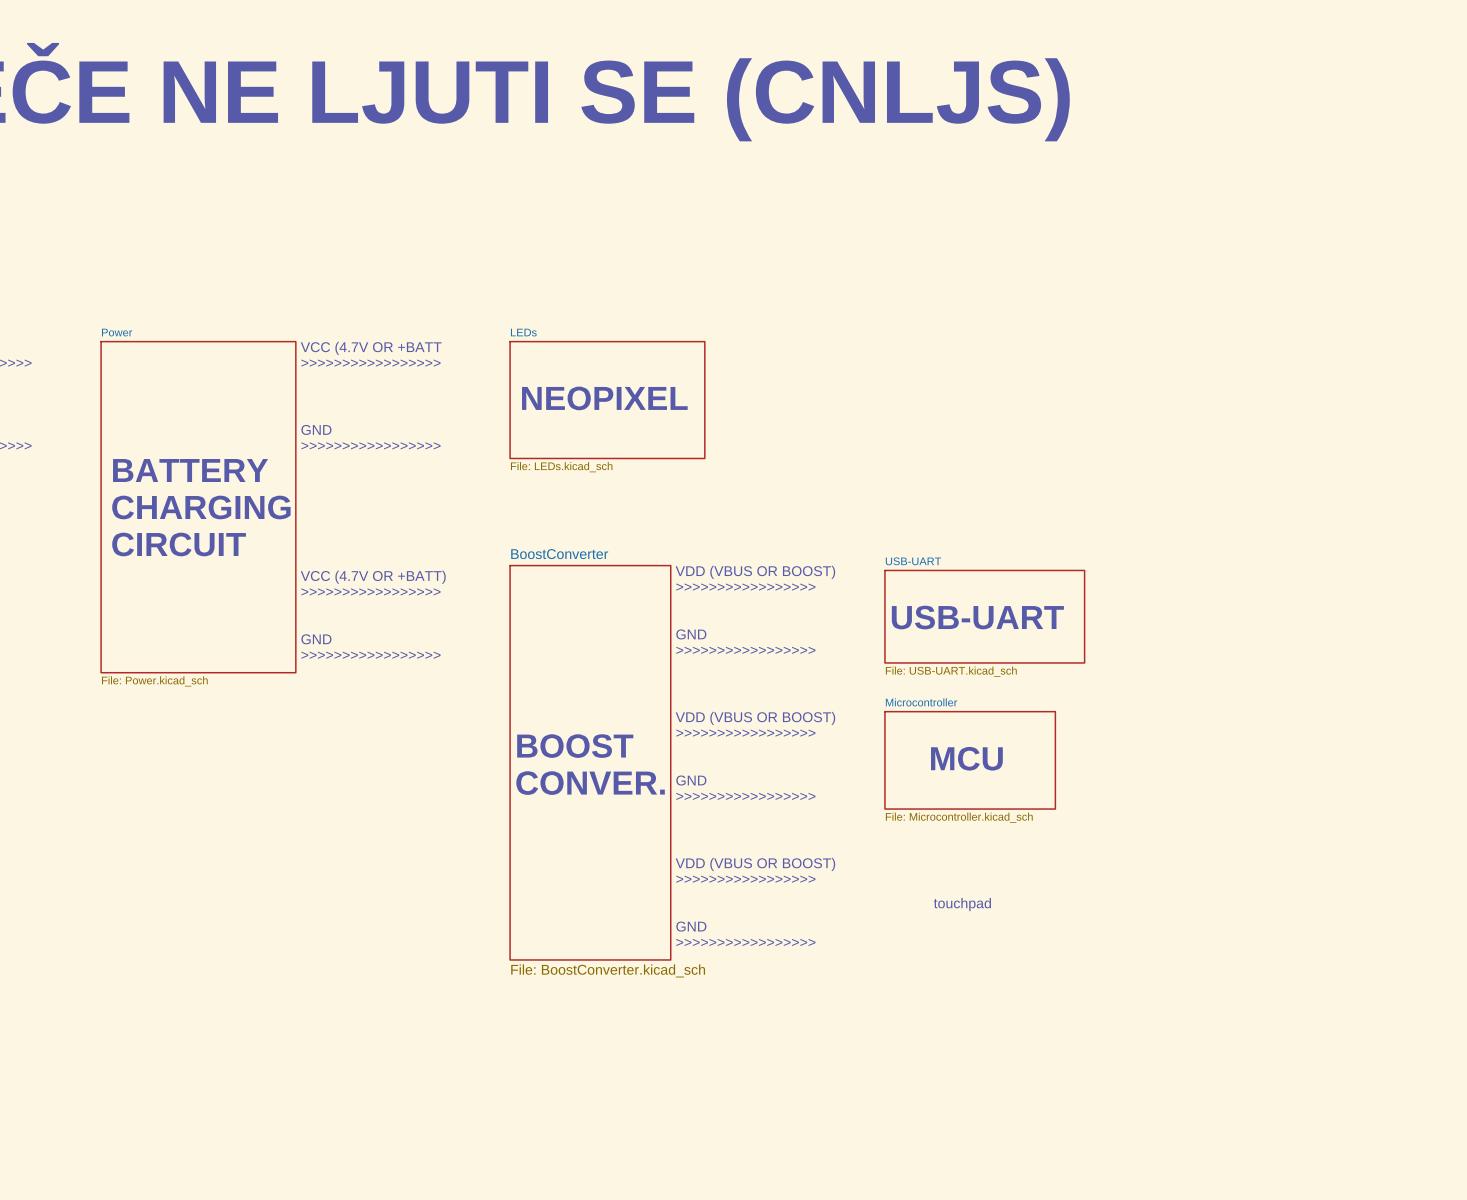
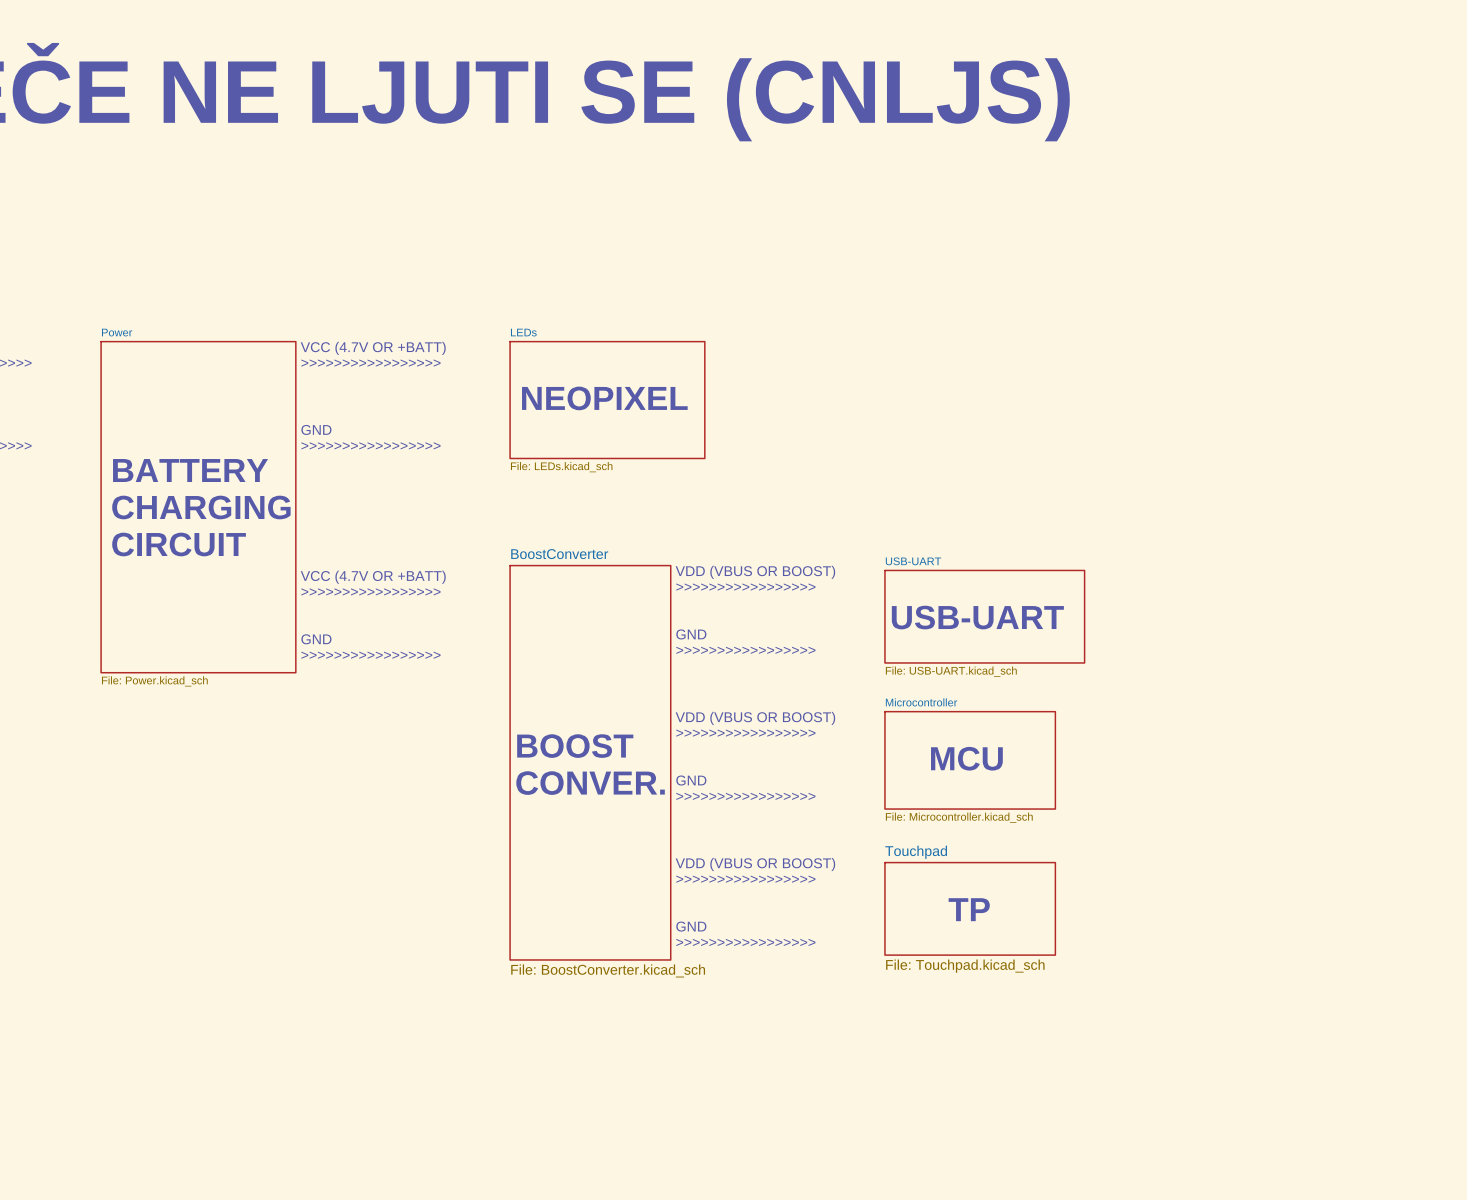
text: VCC (4.7V OR +BATT (371, 348) -> VCC (4.7V OR +BATT) (373, 348)
text: touchpad (962, 904) -> none
sheet Touchpad: none -> File: Touchpad.kicad_sch (970, 908)
text: none -> TP (969, 909)

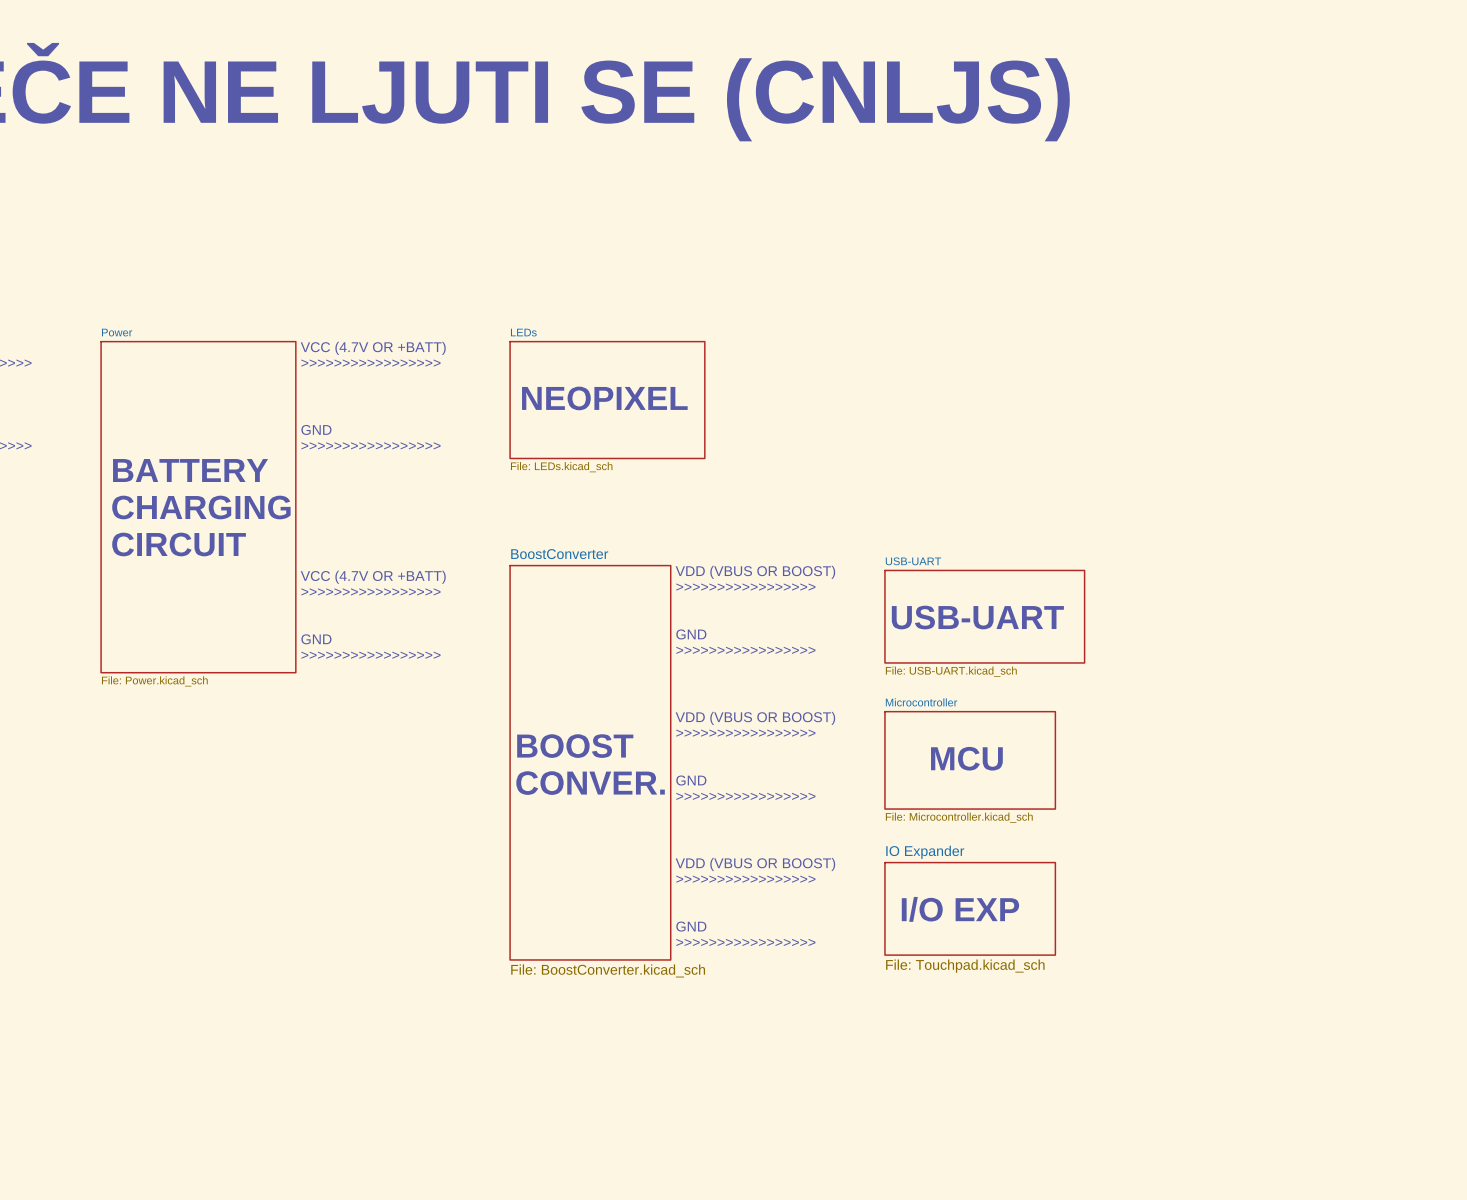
sheet Touchpad name: Touchpad (916, 852) -> IO Expander (925, 852)
text: none -> I/O EXP (960, 909)
text: TP (969, 909) -> none

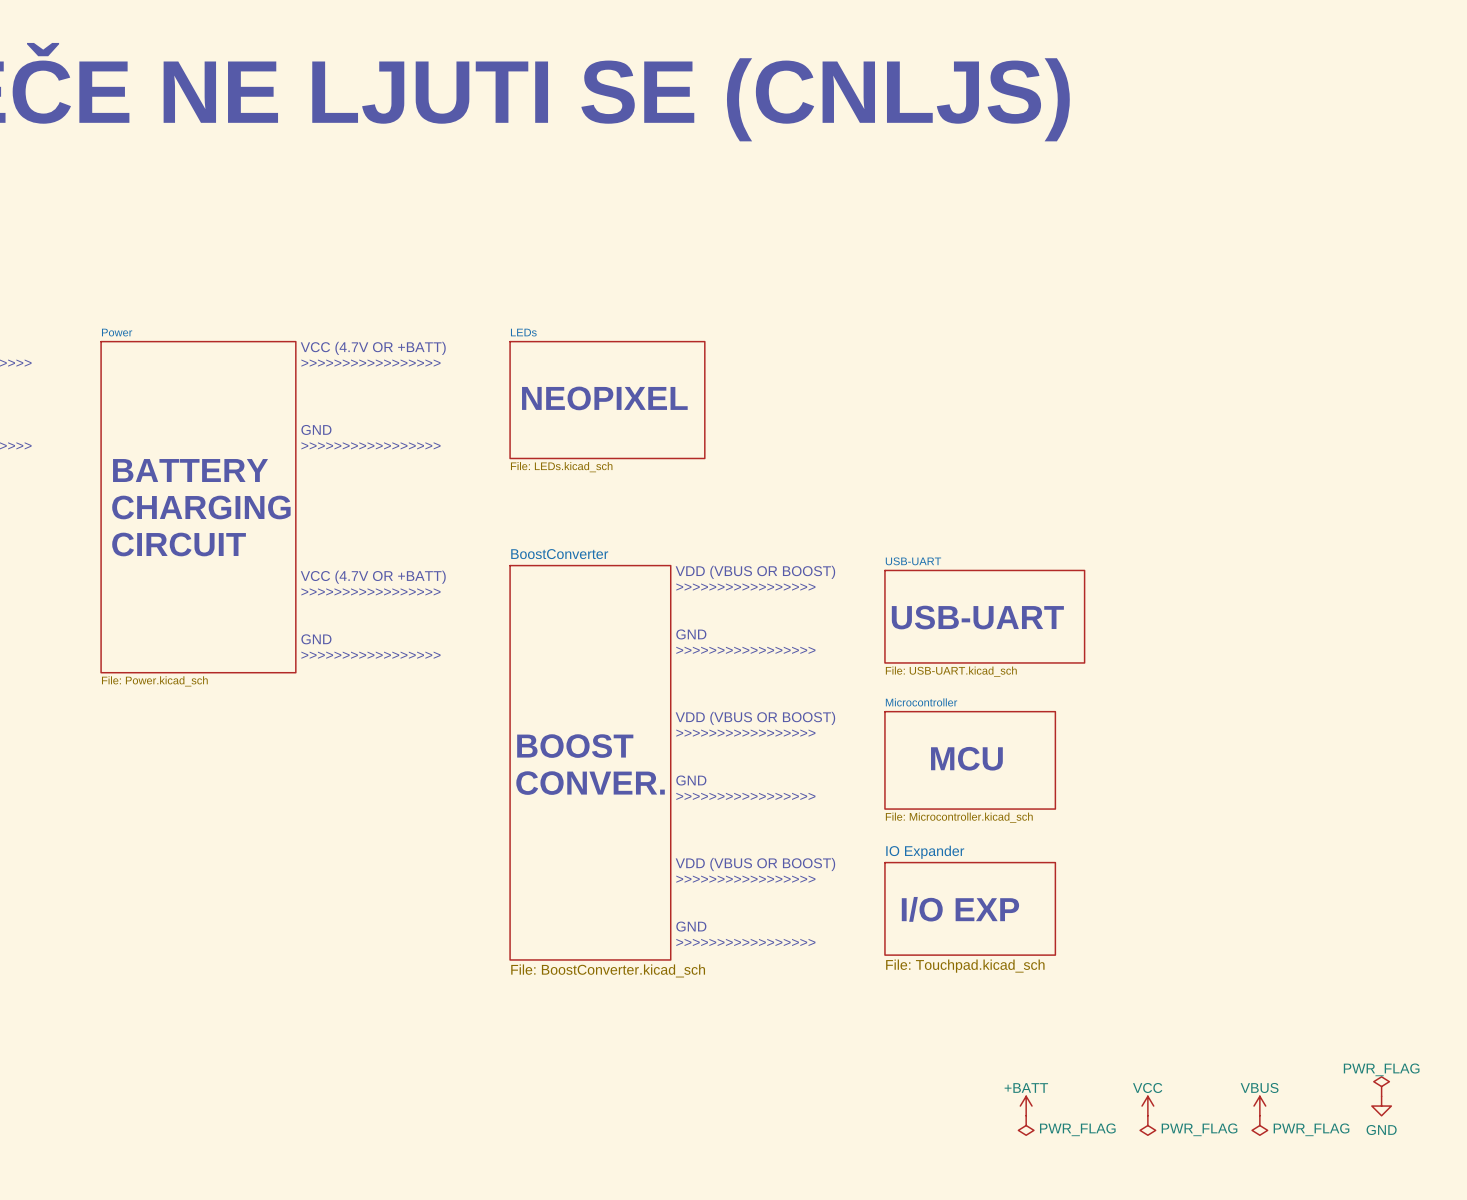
power symbol: none -> PWR_FLAG (1381, 1086)
power symbol: none -> +BATT (1026, 1106)
power symbol: none -> VCC (1147, 1106)
power symbol: none -> VBUS (1259, 1106)
power symbol: none -> GND (1381, 1106)
power symbol: none -> PWR_FLAG (1026, 1125)
power symbol: none -> PWR_FLAG (1147, 1125)
power symbol: none -> PWR_FLAG (1259, 1125)

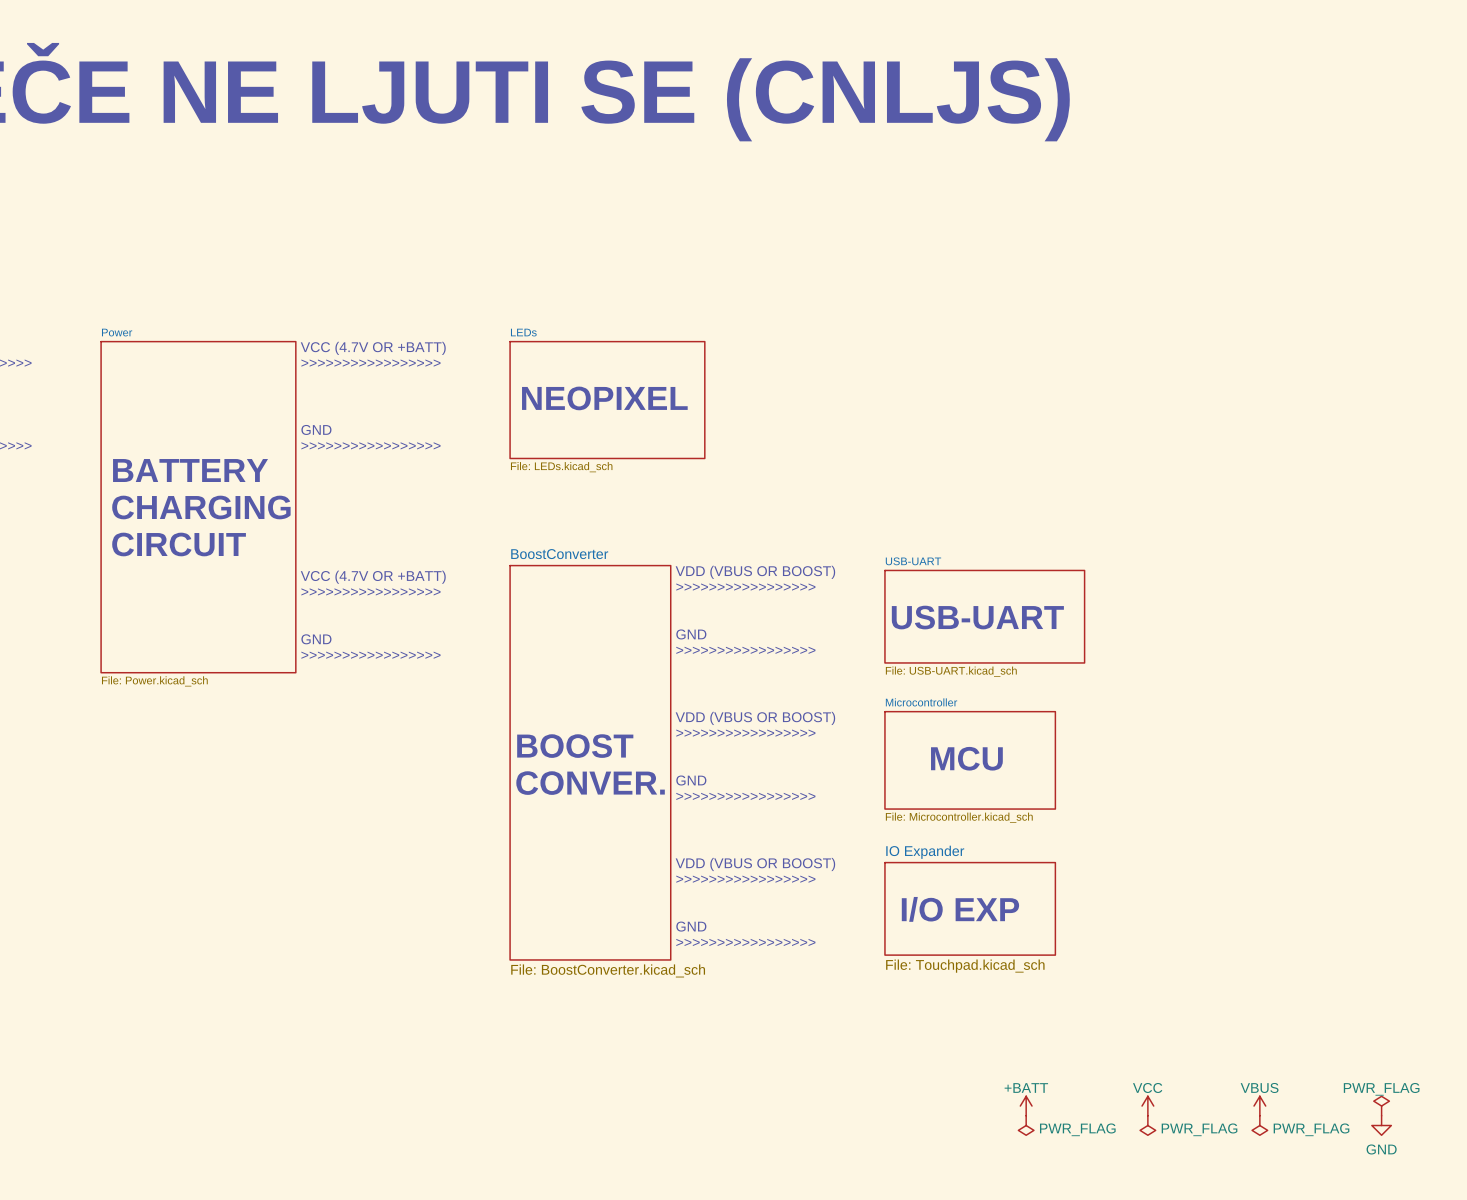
power symbol: PWR_FLAG (1381, 1086) -> none
power symbol: GND (1381, 1106) -> PWR_FLAG (1381, 1106)
power symbol: none -> GND (1381, 1125)

